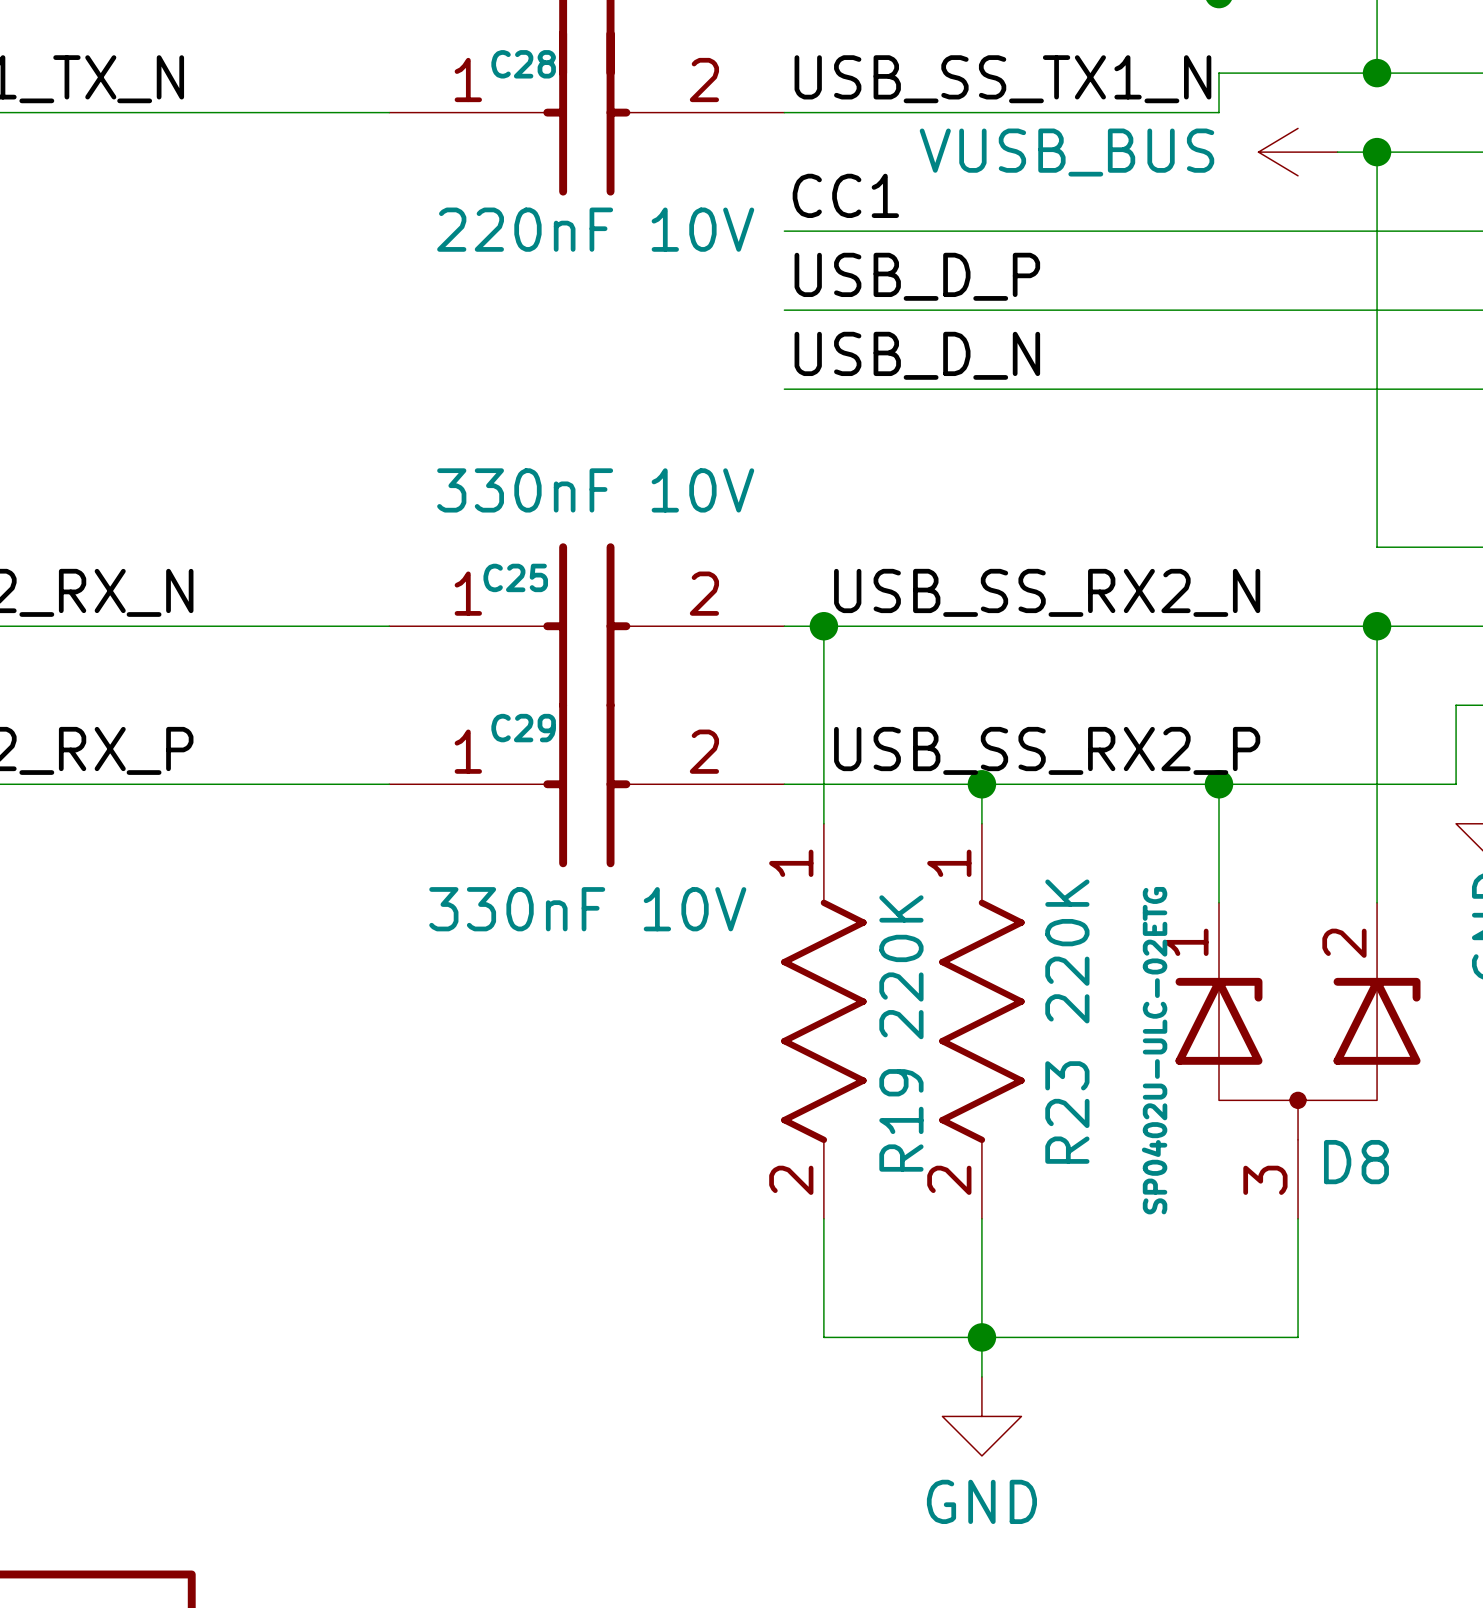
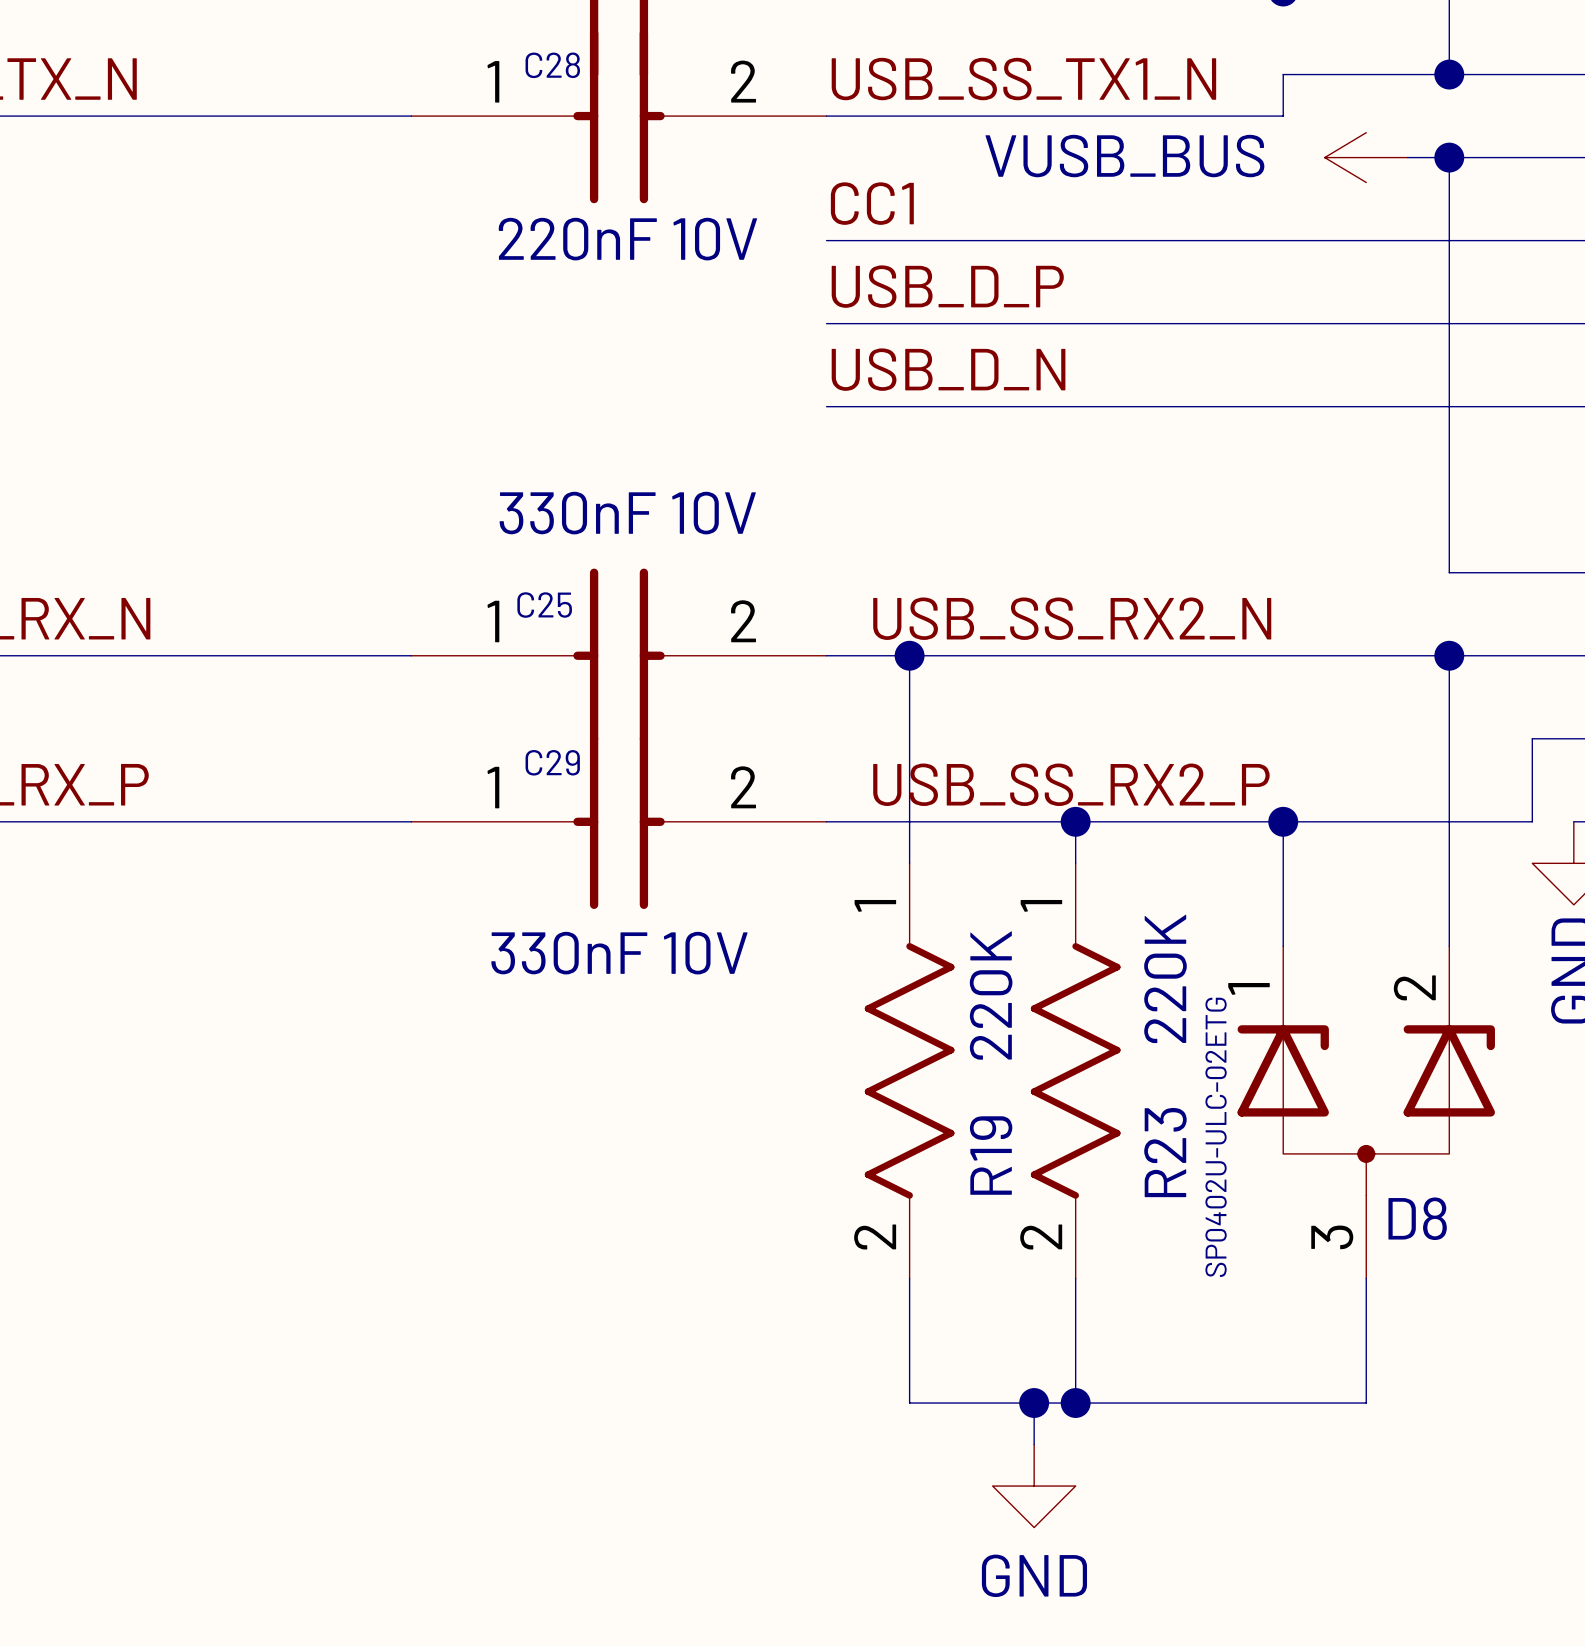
wire: (823, 626) (823, 823) -> (909, 655) (909, 863)
junction position: (823, 626) -> (909, 655)
wire: (981, 784) (981, 823) -> (1075, 821) (1075, 863)
junction position: (981, 784) -> (1075, 821)
R19 position: (823, 1021) -> (909, 1070)
R23 position: (981, 1021) -> (1075, 1070)
wire: (823, 1218) (823, 1337) (863, 1337) -> (909, 1278) (909, 1403)
wire: (981, 1218) (981, 1337) -> (1075, 1278) (1075, 1403)
junction: none -> (1075, 1403)

